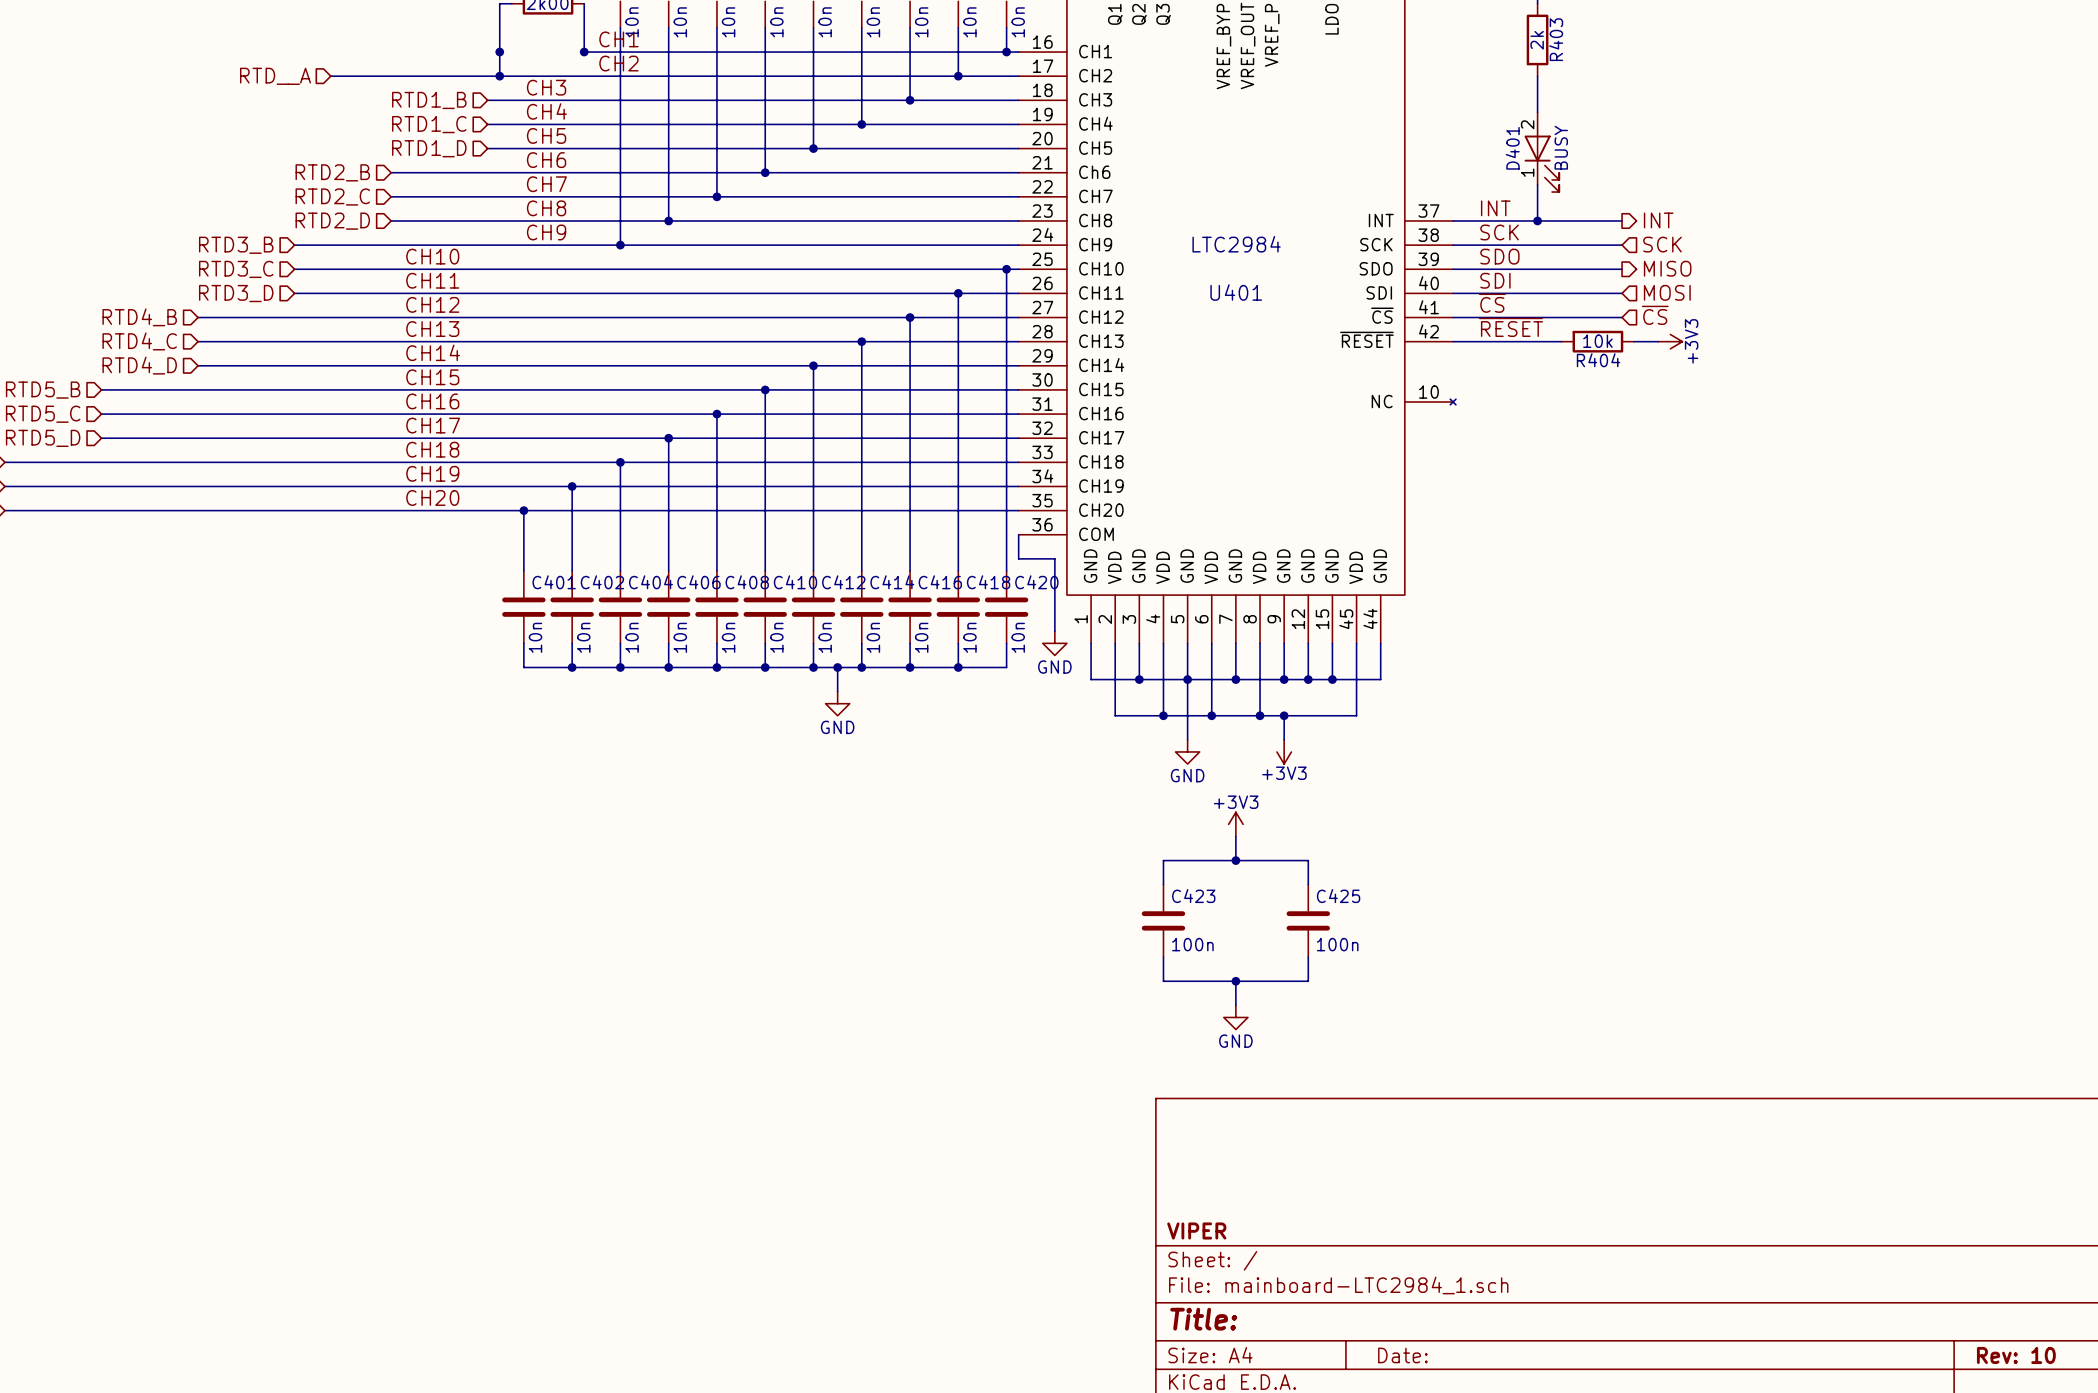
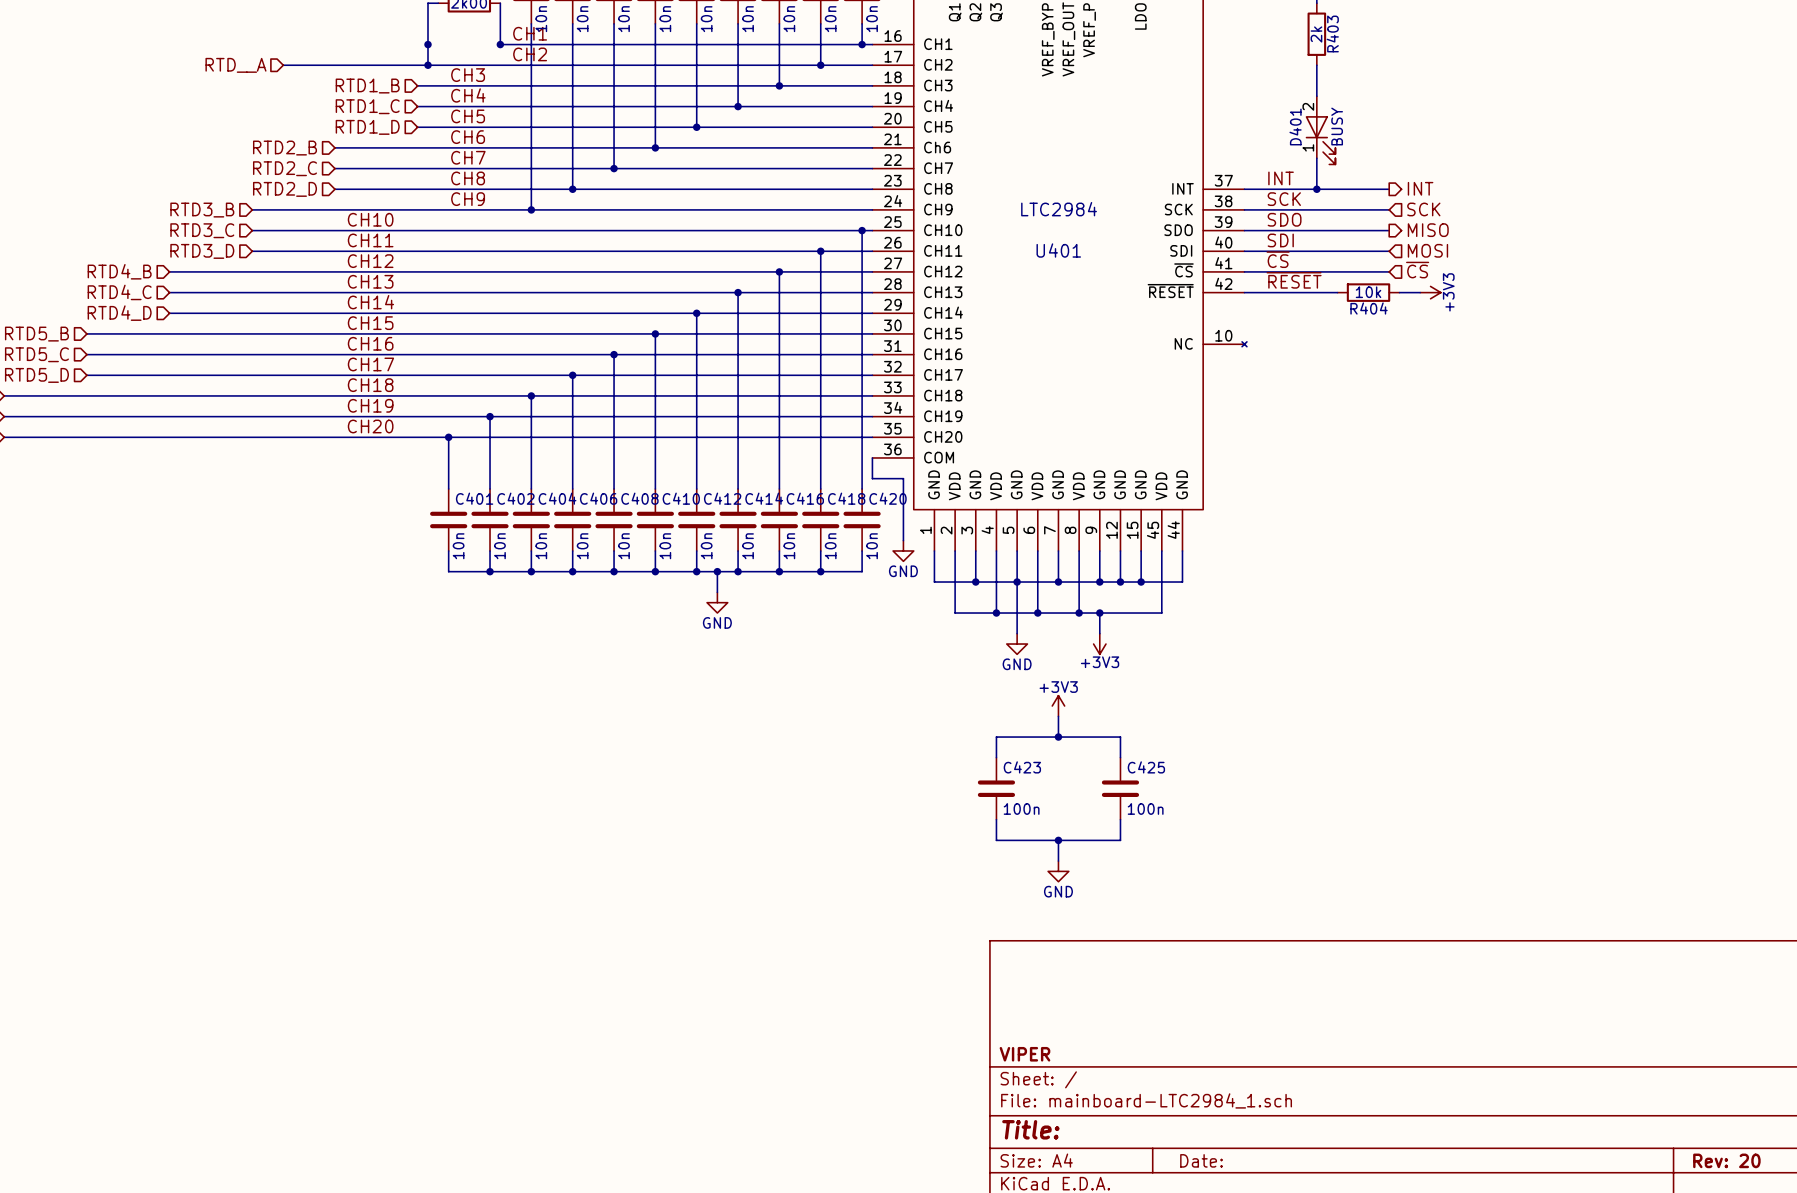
title block: Rev: 10 (2016, 1355) -> Rev: 20 (1726, 1160)

